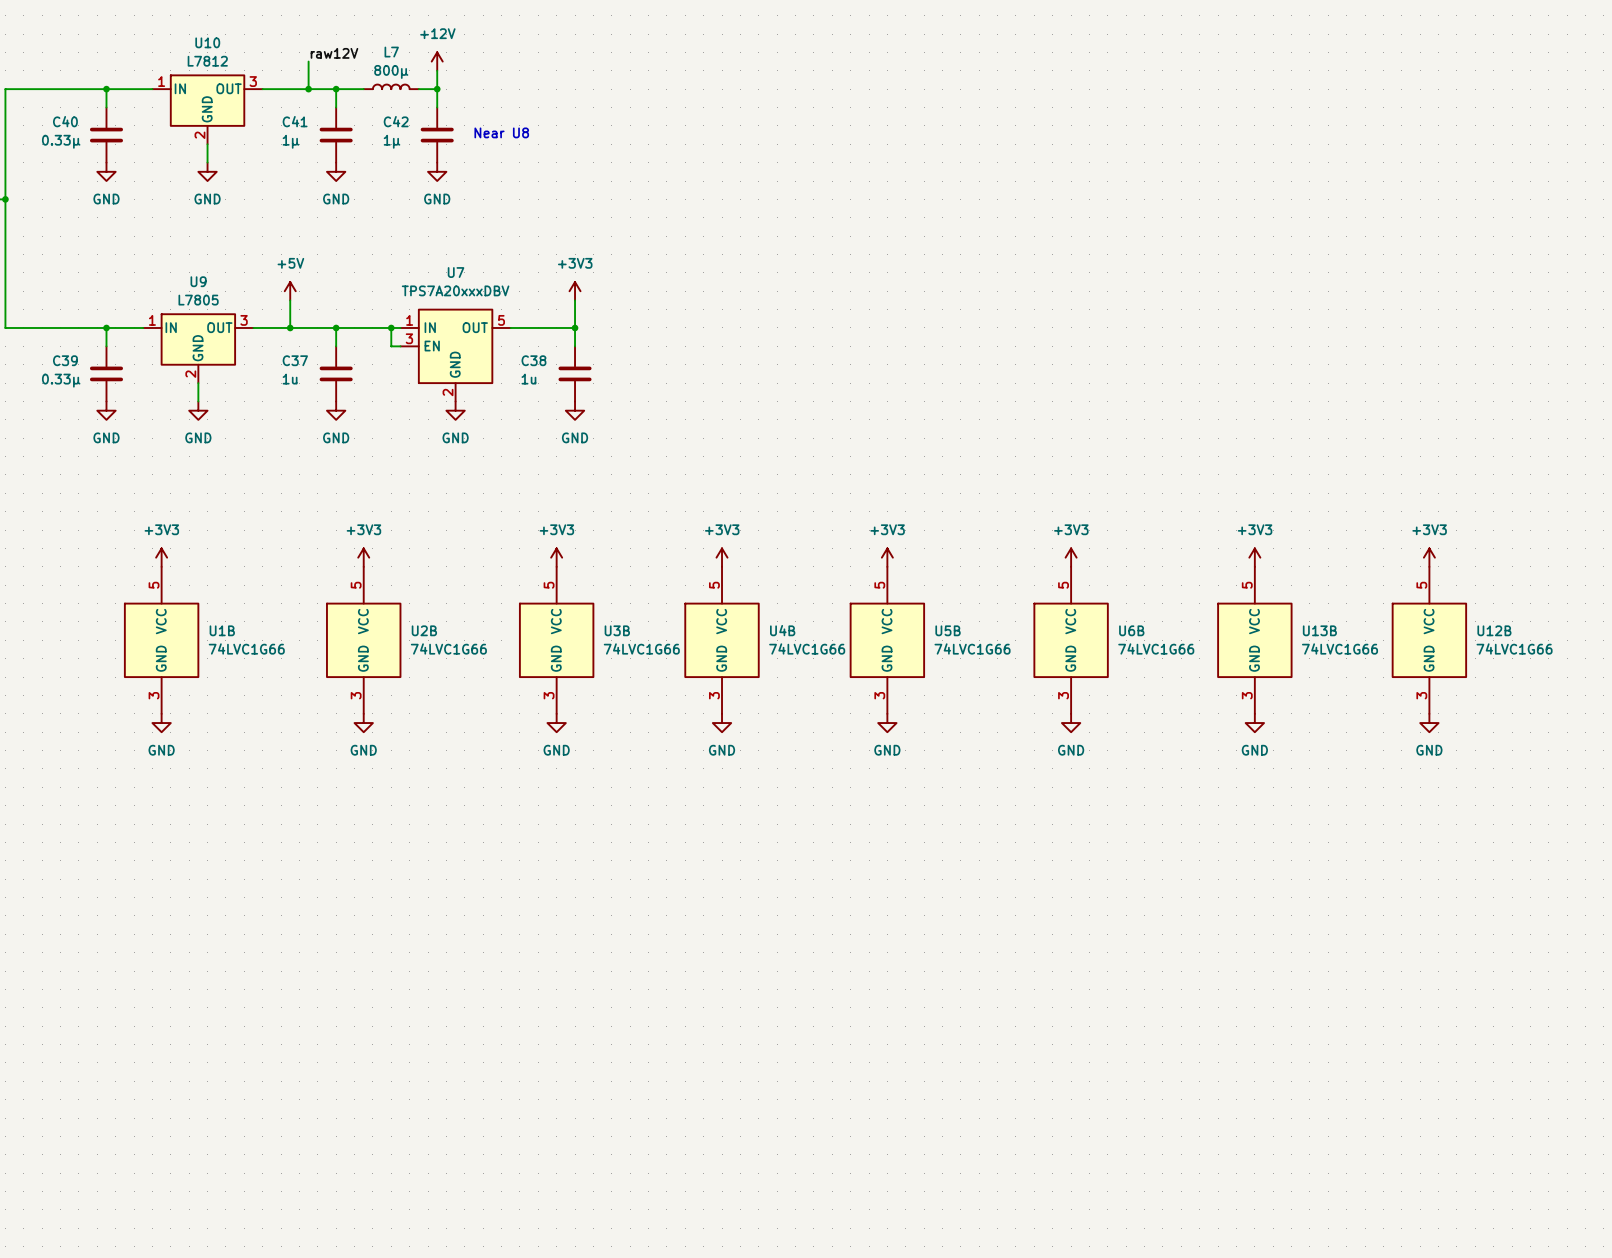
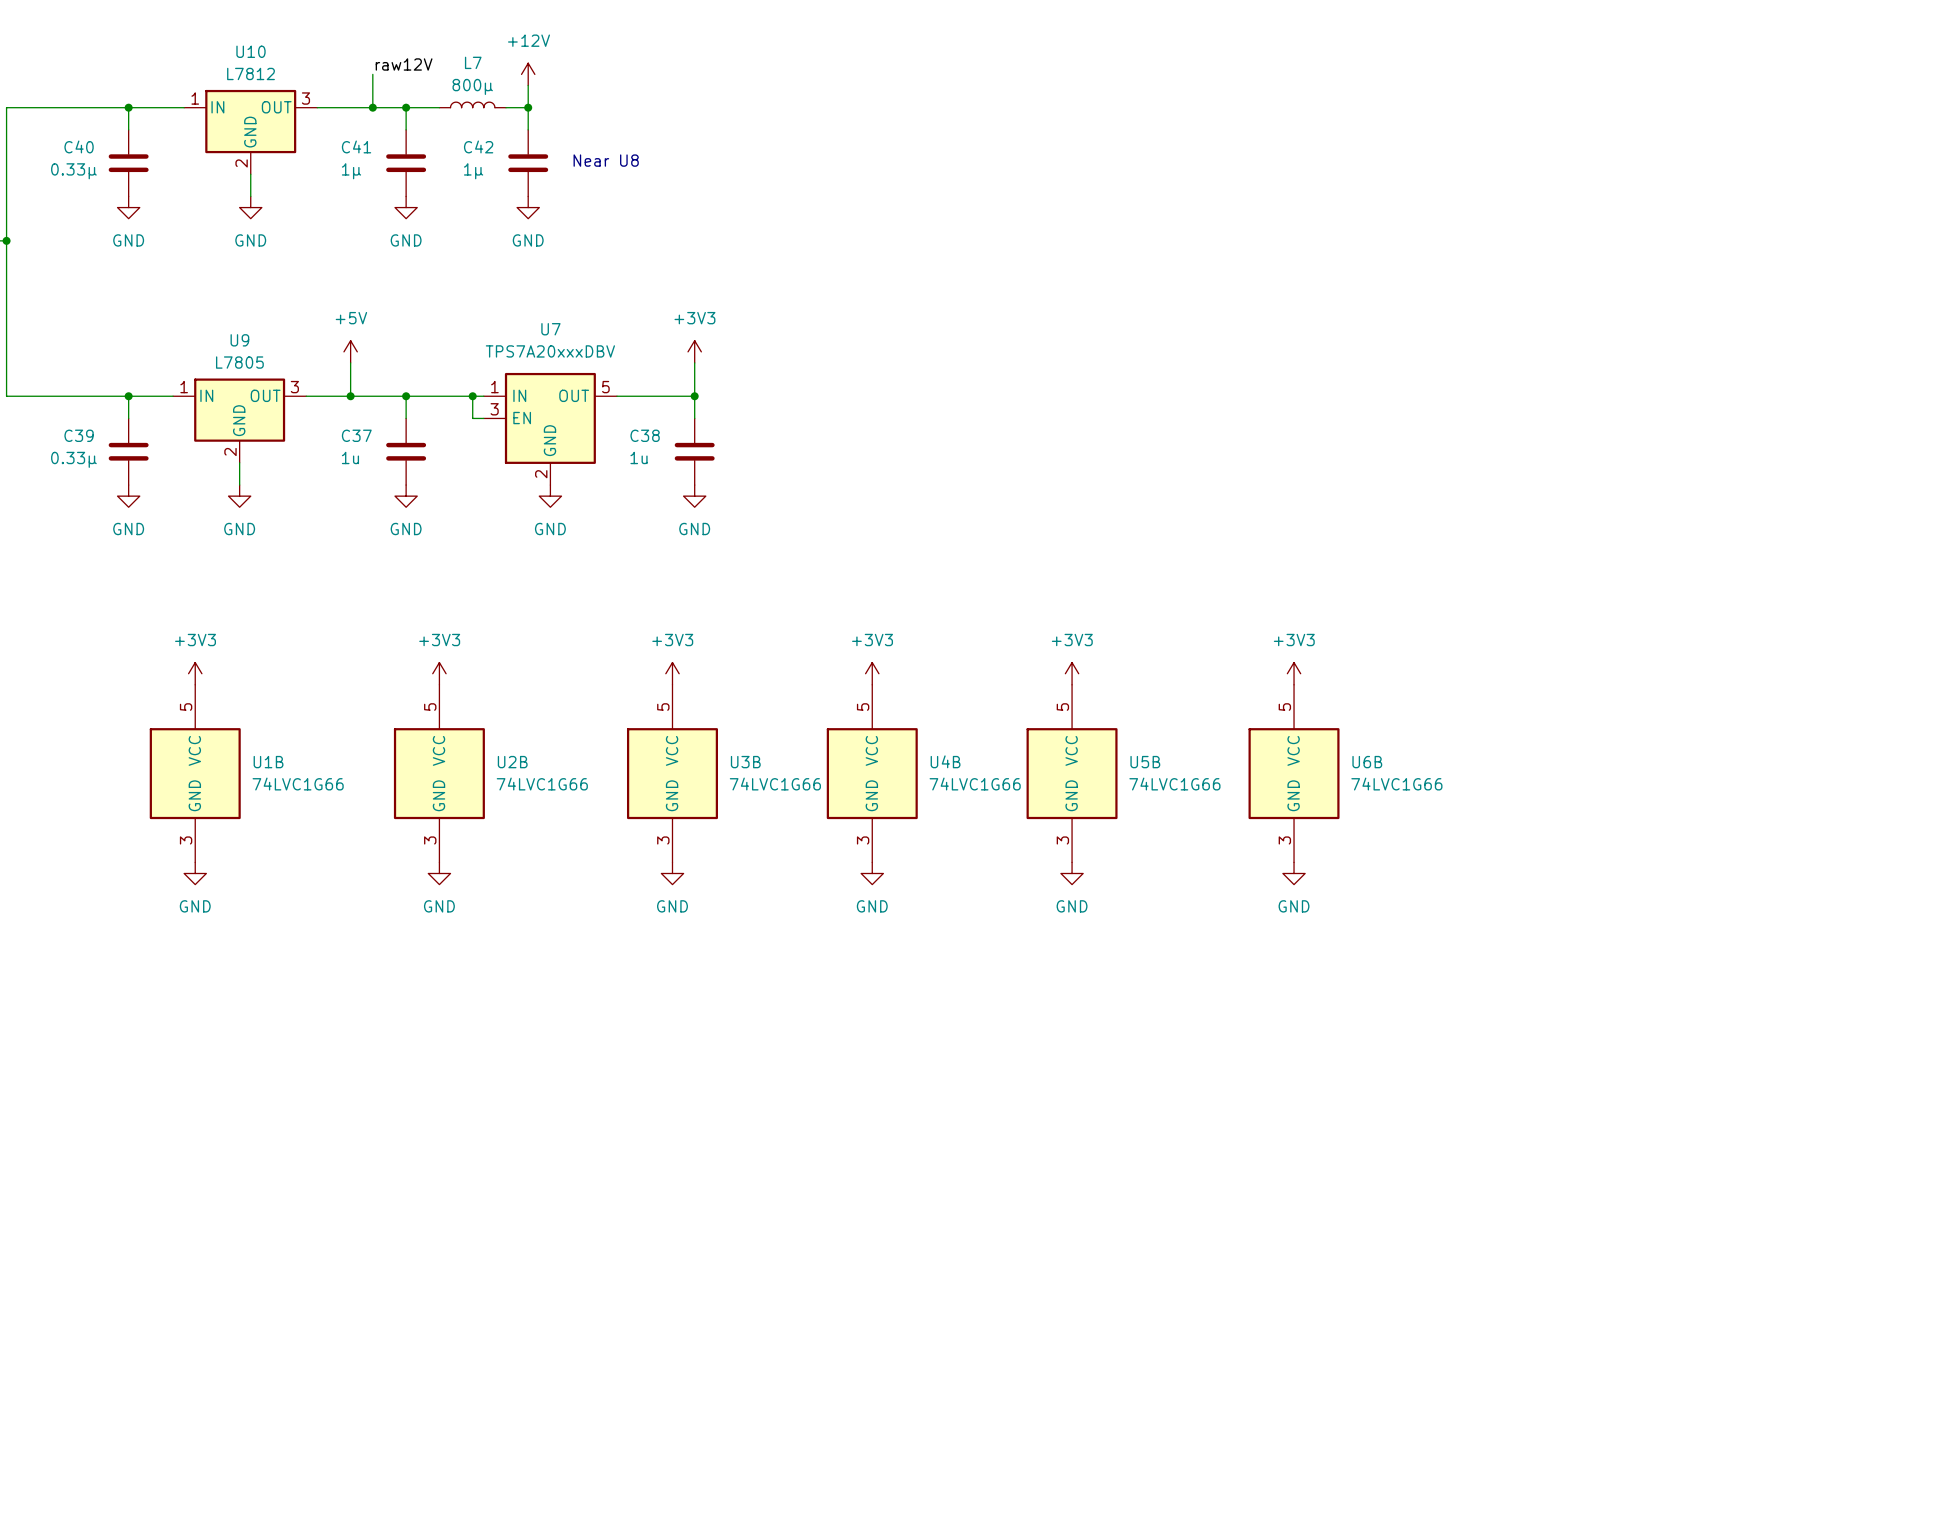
power symbol: +3V3 (1254, 557) -> none
power symbol: +3V3 (1429, 557) -> none
U13B: 74LVC1G66 (1254, 640) -> none
U12B: 74LVC1G66 (1429, 640) -> none
power symbol: GND (1254, 723) -> none
power symbol: GND (1429, 723) -> none

